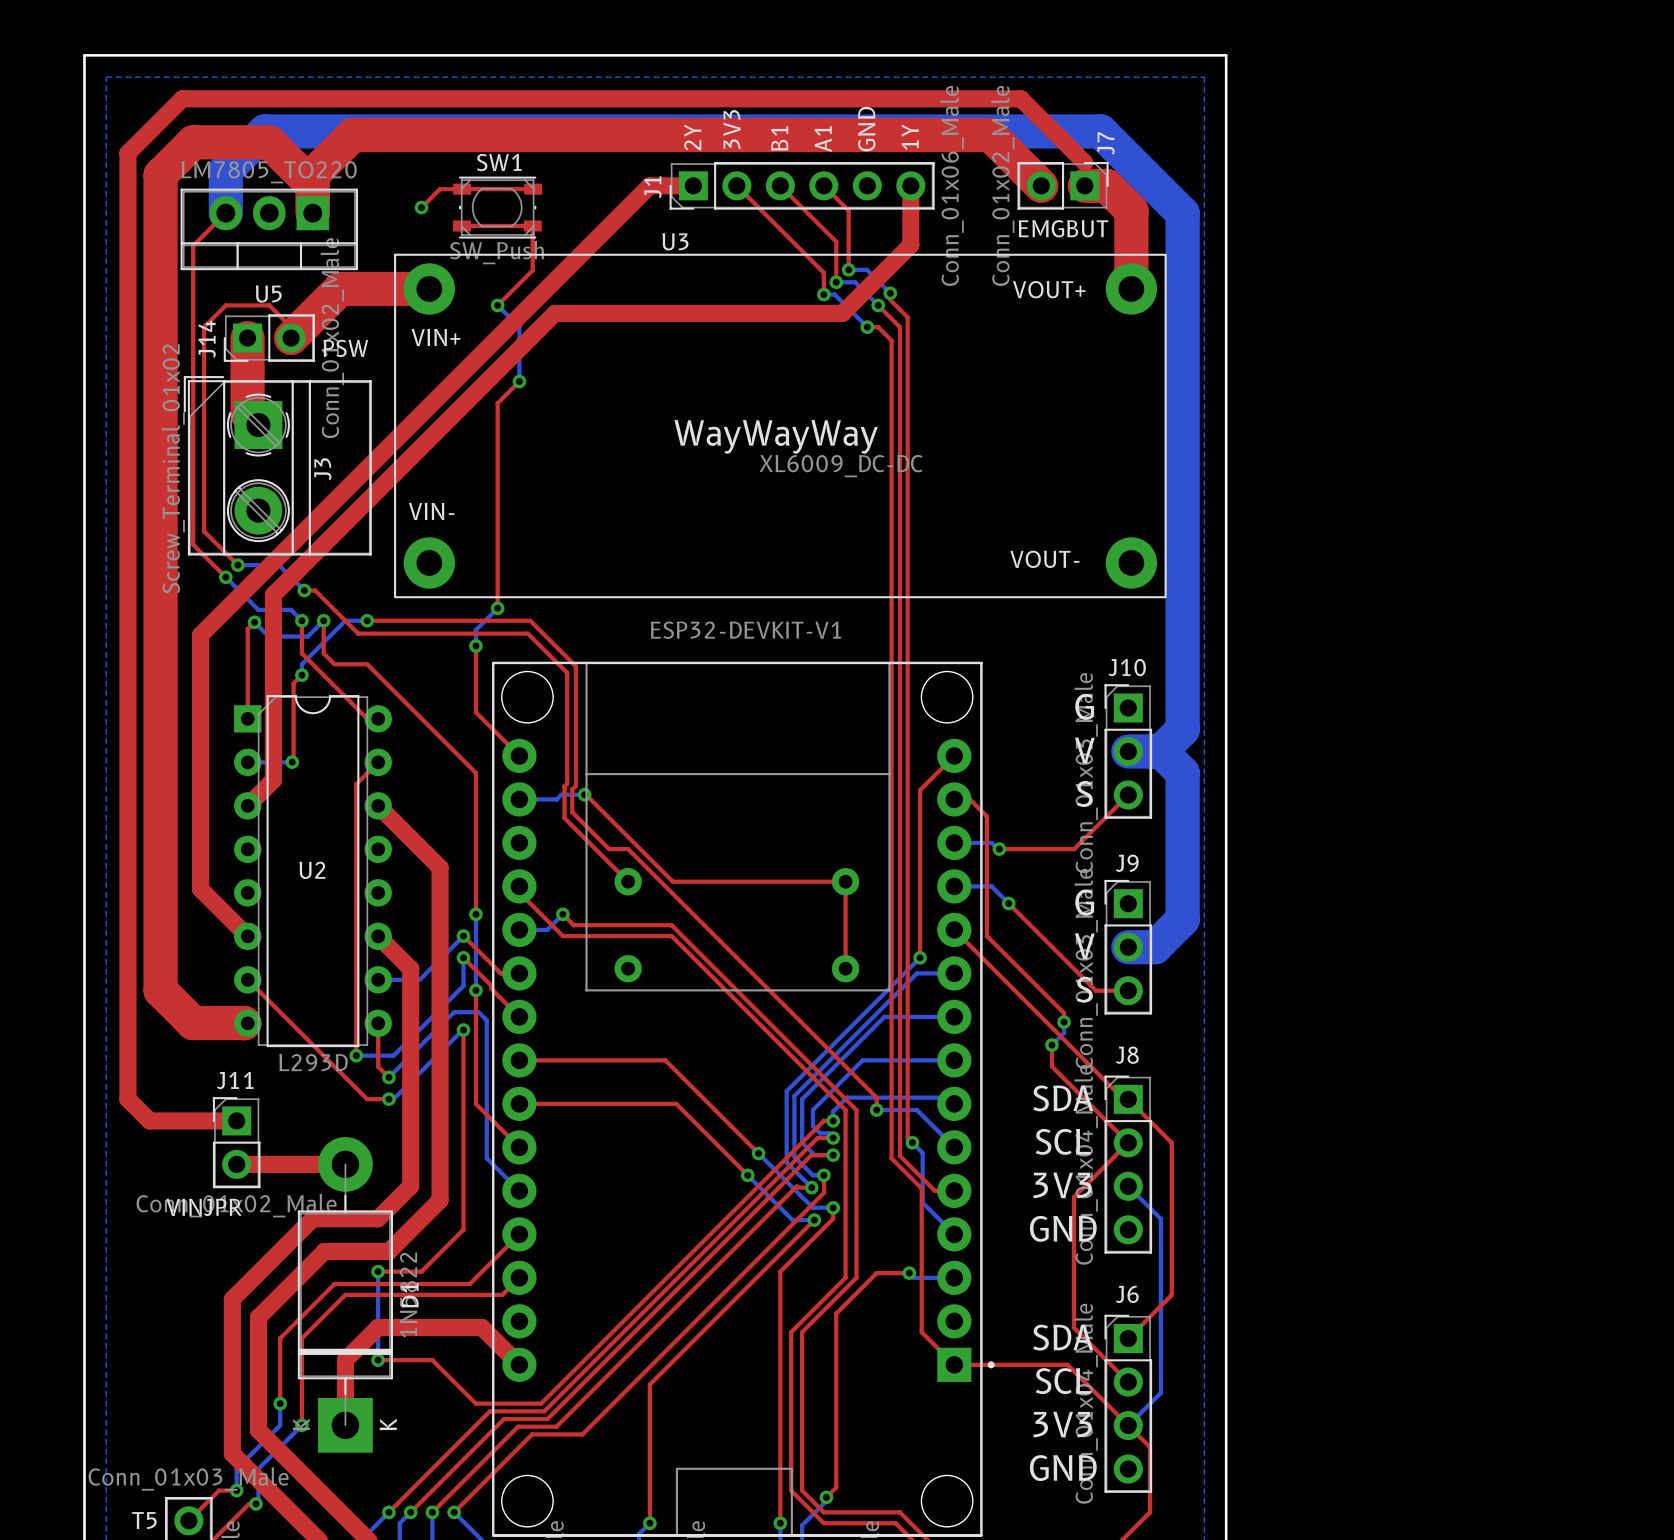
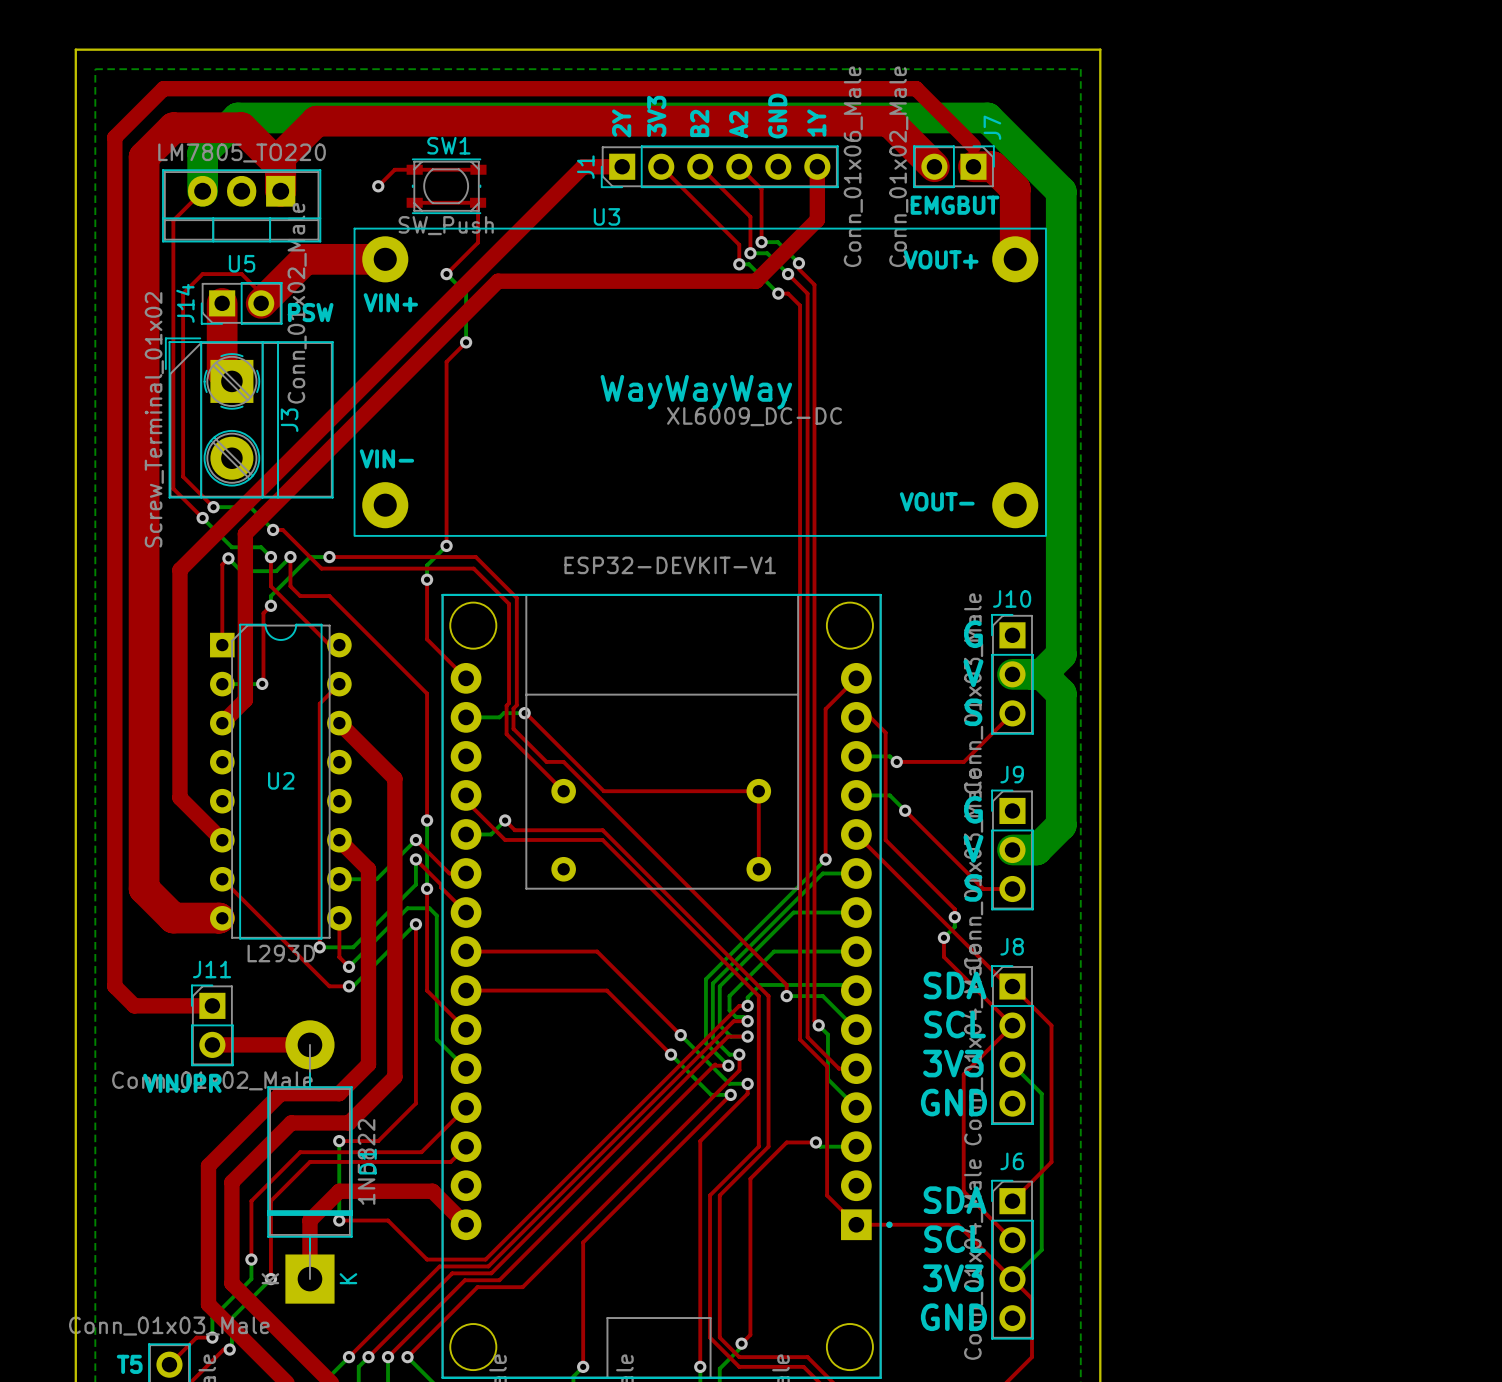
text: B1 (779, 138) -> B2 (699, 123)
text: A1 (823, 139) -> A2 (738, 124)

